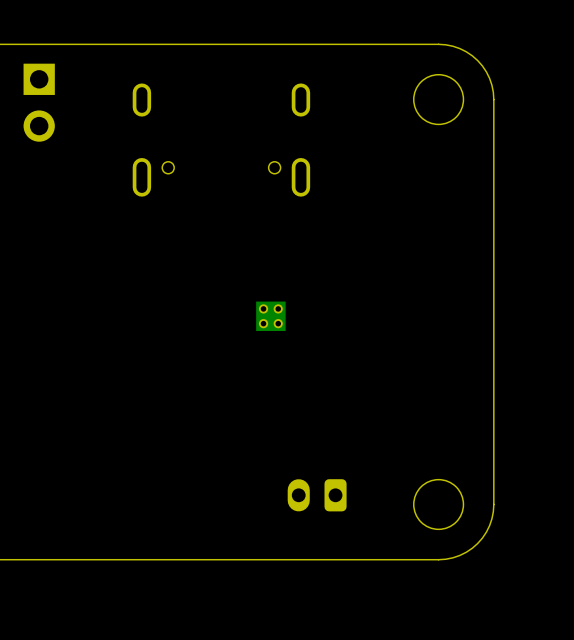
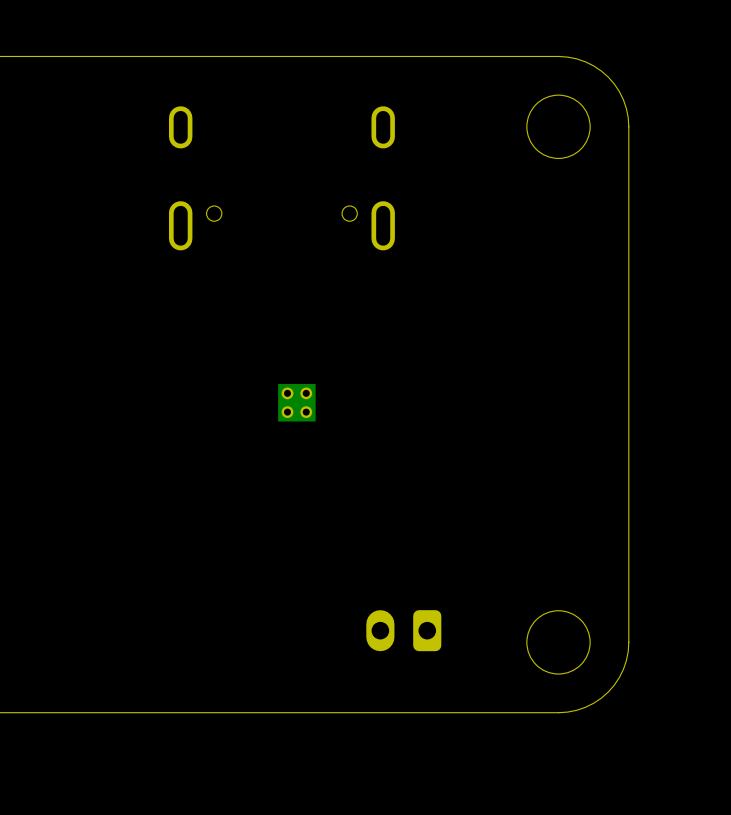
part: (39, 102) -> none
part position: (270, 316) -> (296, 402)

